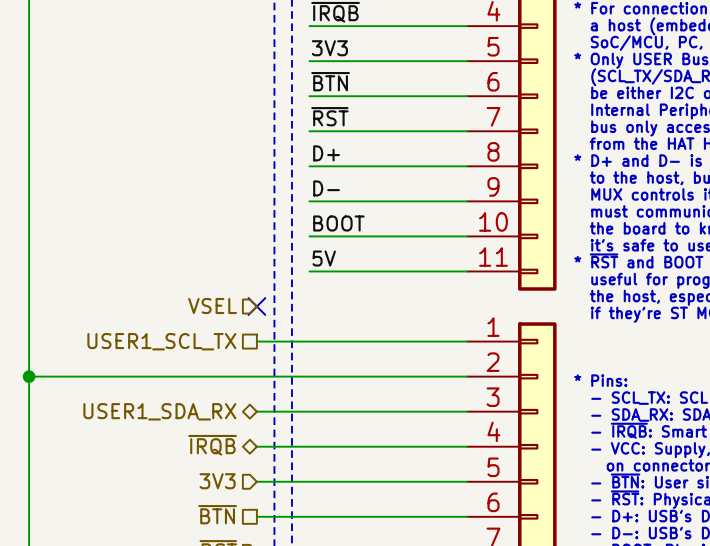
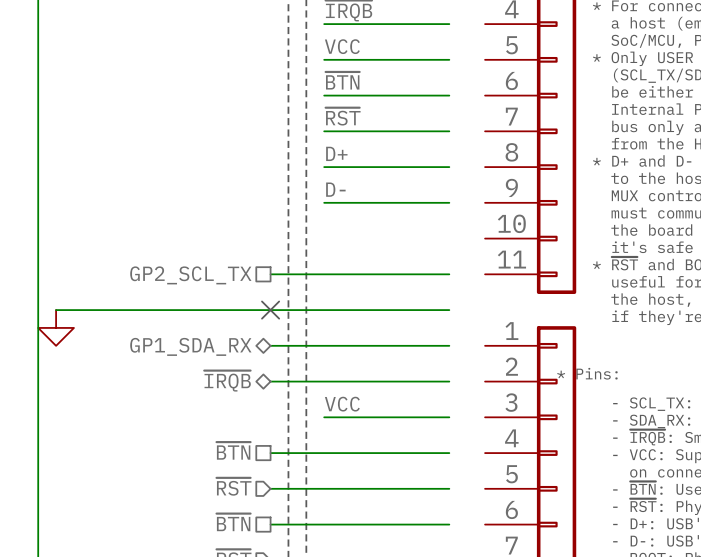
wire: (432, 26) (467, 26) -> none
label: 3V3 (329, 48) -> VCC (342, 46)
wire: (432, 61) (467, 61) -> none
wire: (432, 96) (467, 96) -> none
wire: (432, 131) (467, 131) -> none
wire: (432, 166) (467, 166) -> none
wire: (432, 201) (467, 201) -> none
label: BOOT (338, 223) -> none
wire: (309, 236) (467, 236) -> none
label: 5V (324, 258) -> none
hierarchical label: none -> GP2_SCL_TX (190, 275)
wire: (432, 271) (467, 271) -> none
hierarchical label: VSEL (212, 305) -> none
wire: none -> (56, 310) (449, 310)
power symbol: none -> (56, 327)
hierarchical label shape: passive (161, 341) -> bidirectional (190, 346)
hierarchical label: USER1_SCL_TX (161, 341) -> GP1_SDA_RX (190, 346)
wire: (432, 341) (467, 341) -> none
hierarchical label: none -> ~{IRQB} (227, 381)
wire: (29, 376) (256, 376) -> none
junction: (29, 376) -> none
wire: (432, 376) (467, 376) -> none
text position: * Pins: (600, 380) -> * Pins: (587, 373)
label: none -> VCC (342, 404)
hierarchical label: USER1_SDA_RX (159, 411) -> none
wire: (256, 411) (309, 411) -> (270, 274) (324, 274)
wire: (432, 411) (467, 411) -> none
hierarchical label shape: bidirectional (212, 445) -> passive (233, 450)
hierarchical label: ~{IRQB} (212, 445) -> ~{BTN} (233, 450)
wire: (432, 446) (467, 446) -> none
hierarchical label: 3V3 (217, 481) -> ~{RST} (234, 486)
wire: (432, 481) (467, 481) -> none
wire: (432, 516) (467, 516) -> none

